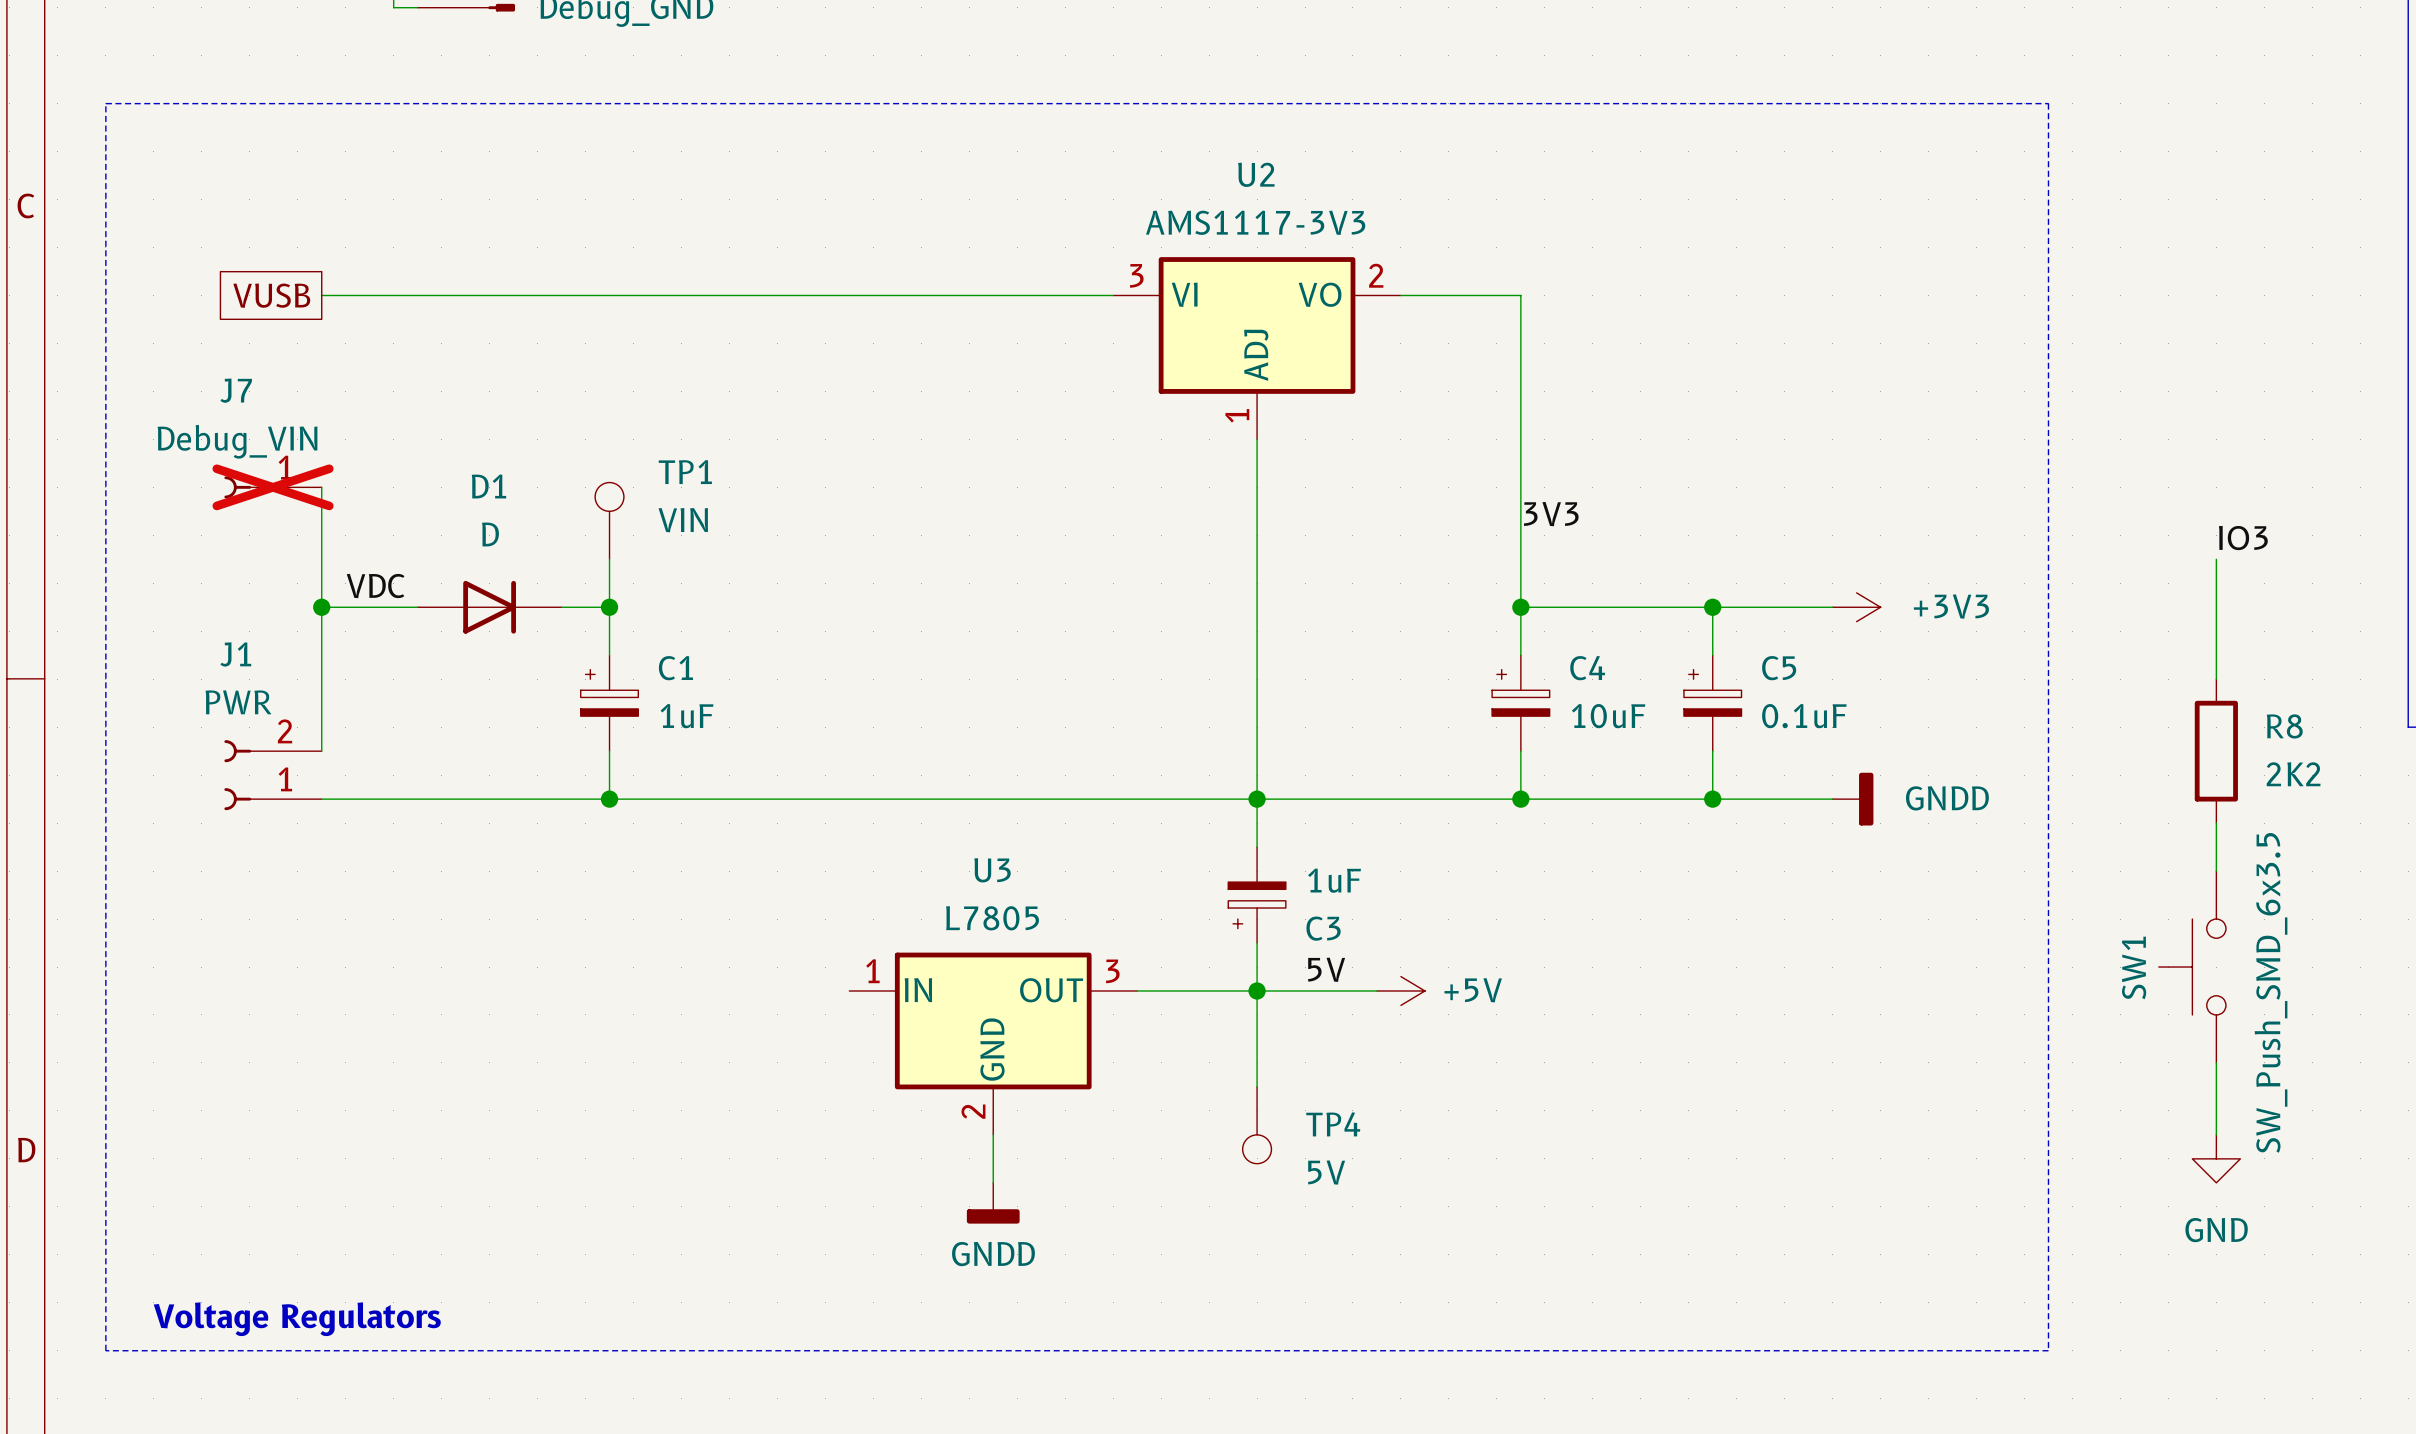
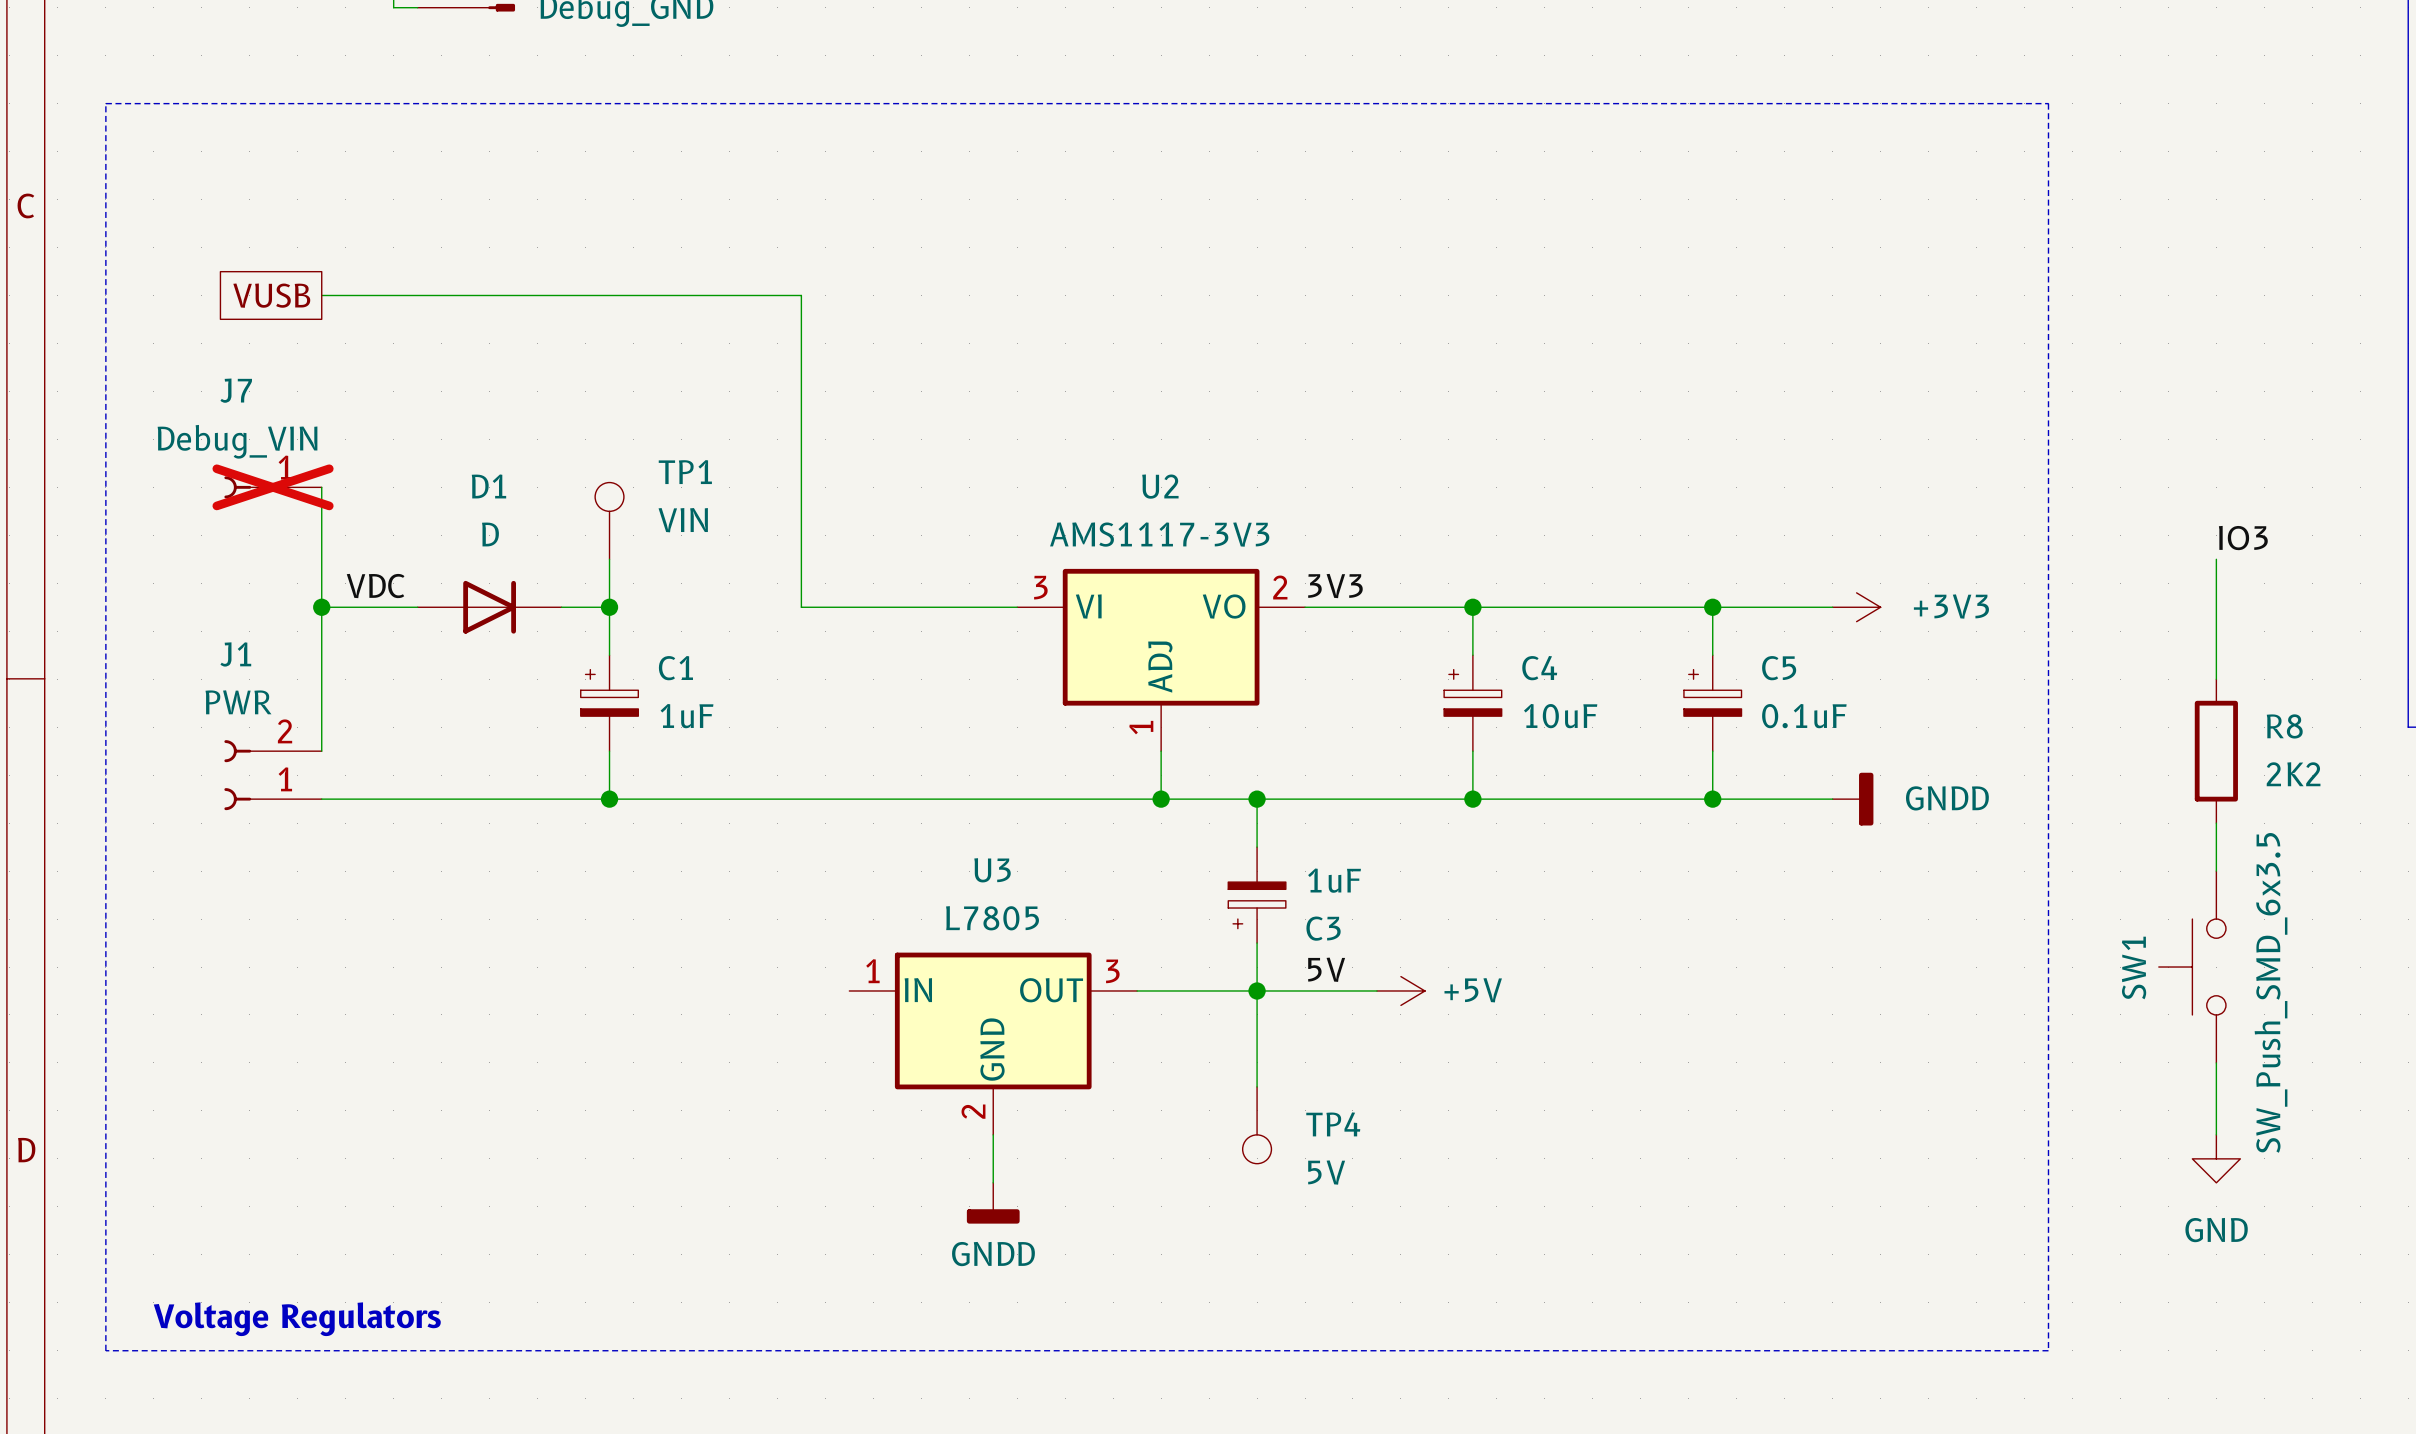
wire: (801, 295) (1113, 295) -> (801, 295) (801, 607) (1017, 607)
wire: (1400, 295) (1520, 295) (1520, 655) -> none
U2 position: (1257, 348) -> (1161, 660)
wire: (1257, 439) (1257, 799) -> none
label position: 3V3 (1551, 514) -> 3V3 (1335, 586)
wire: none -> (1305, 607) (1520, 607)
wire: none -> (1472, 607) (1472, 655)
junction position: (1520, 607) -> (1472, 607)
C4 position: (1520, 703) -> (1472, 703)
wire: none -> (1161, 751) (1161, 799)
wire: (1520, 751) (1520, 799) -> (1472, 751) (1472, 799)
junction: none -> (1161, 799)
junction position: (1520, 799) -> (1472, 799)

